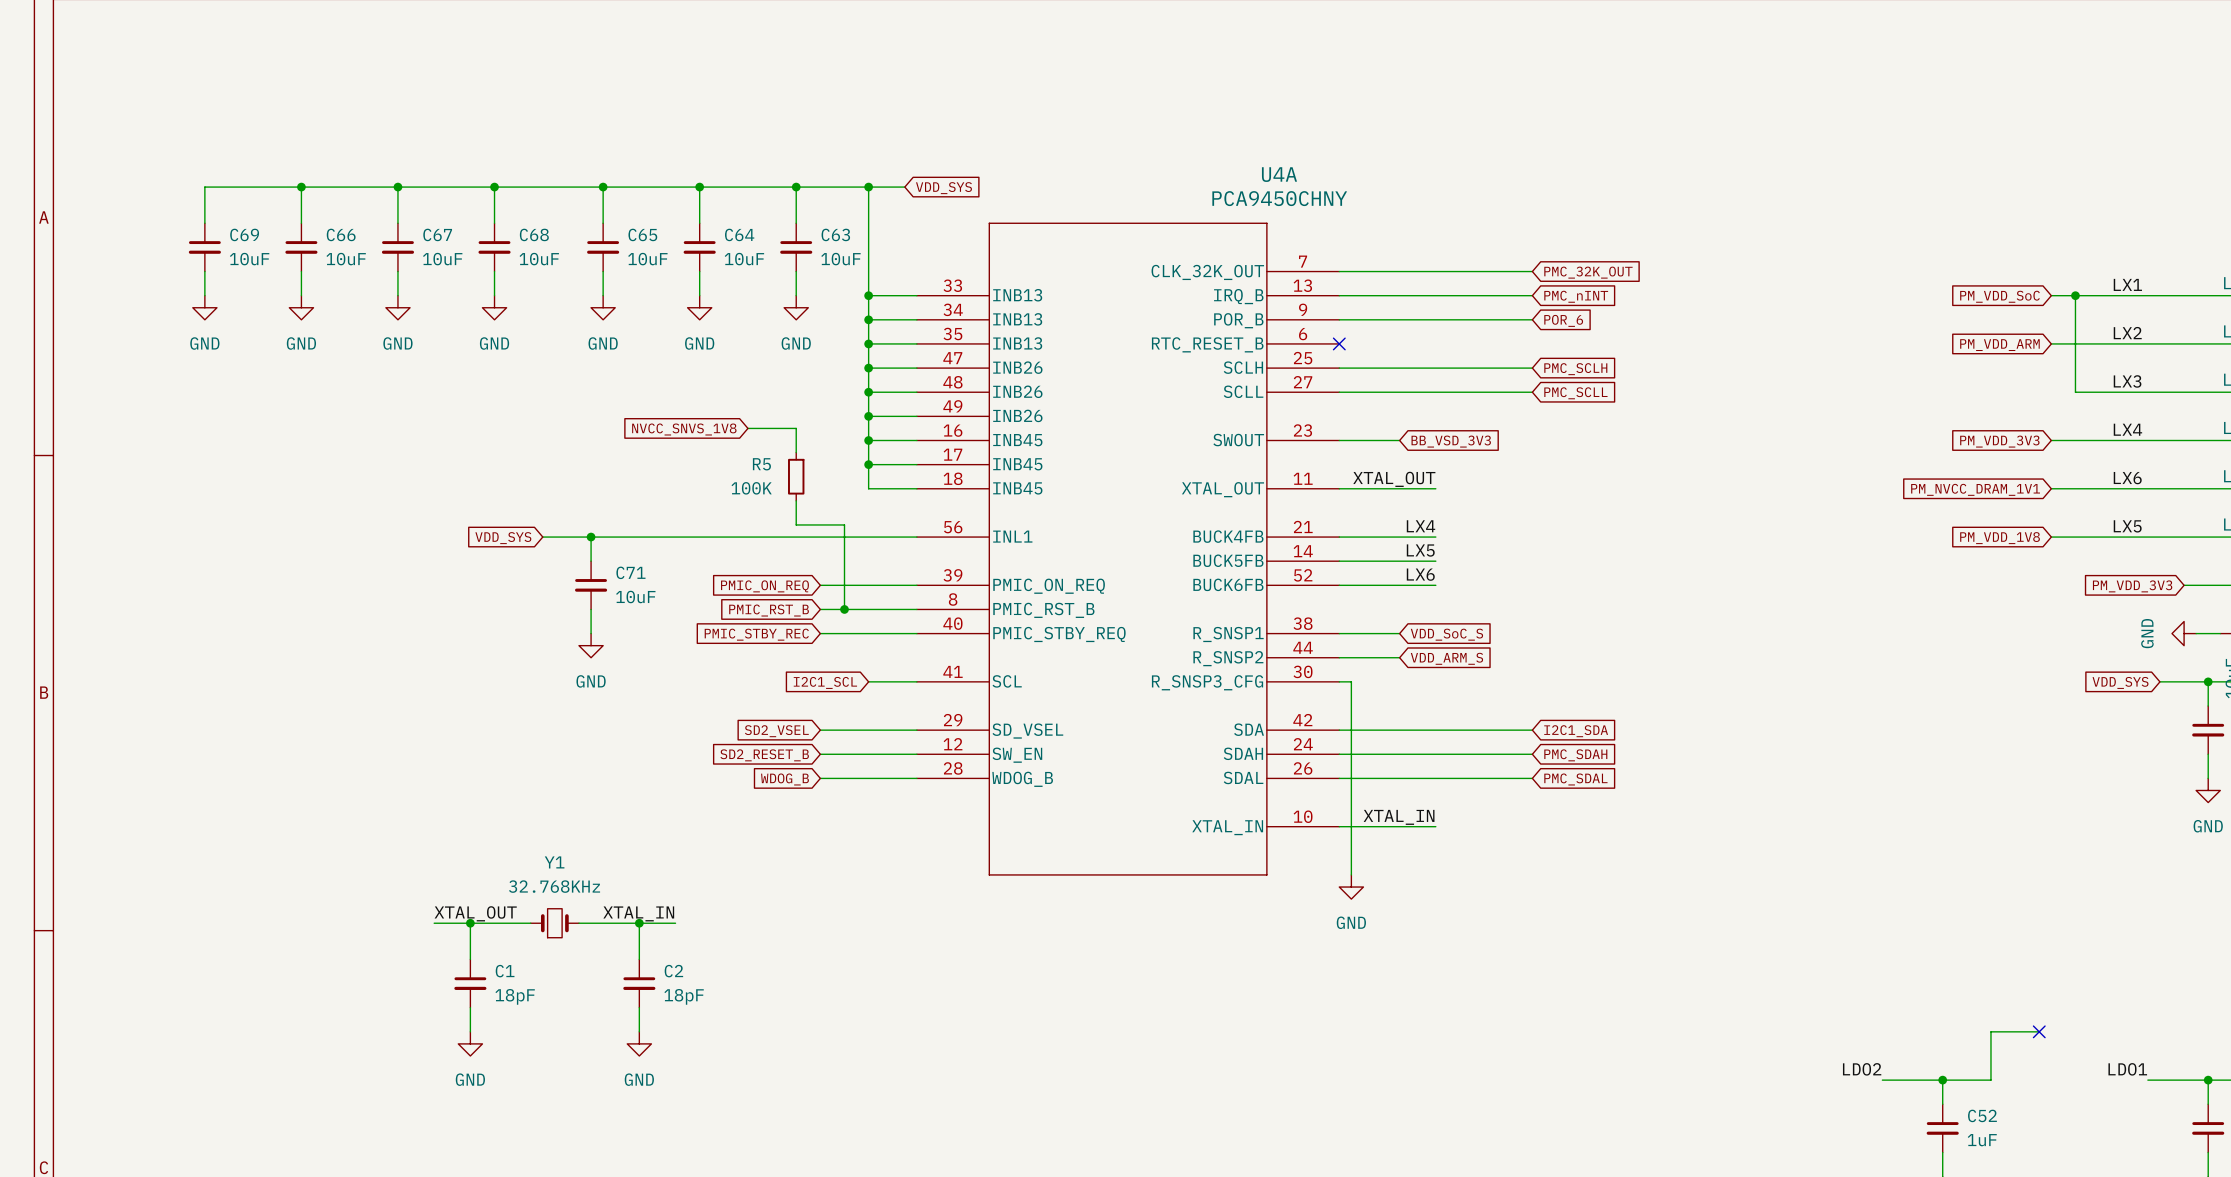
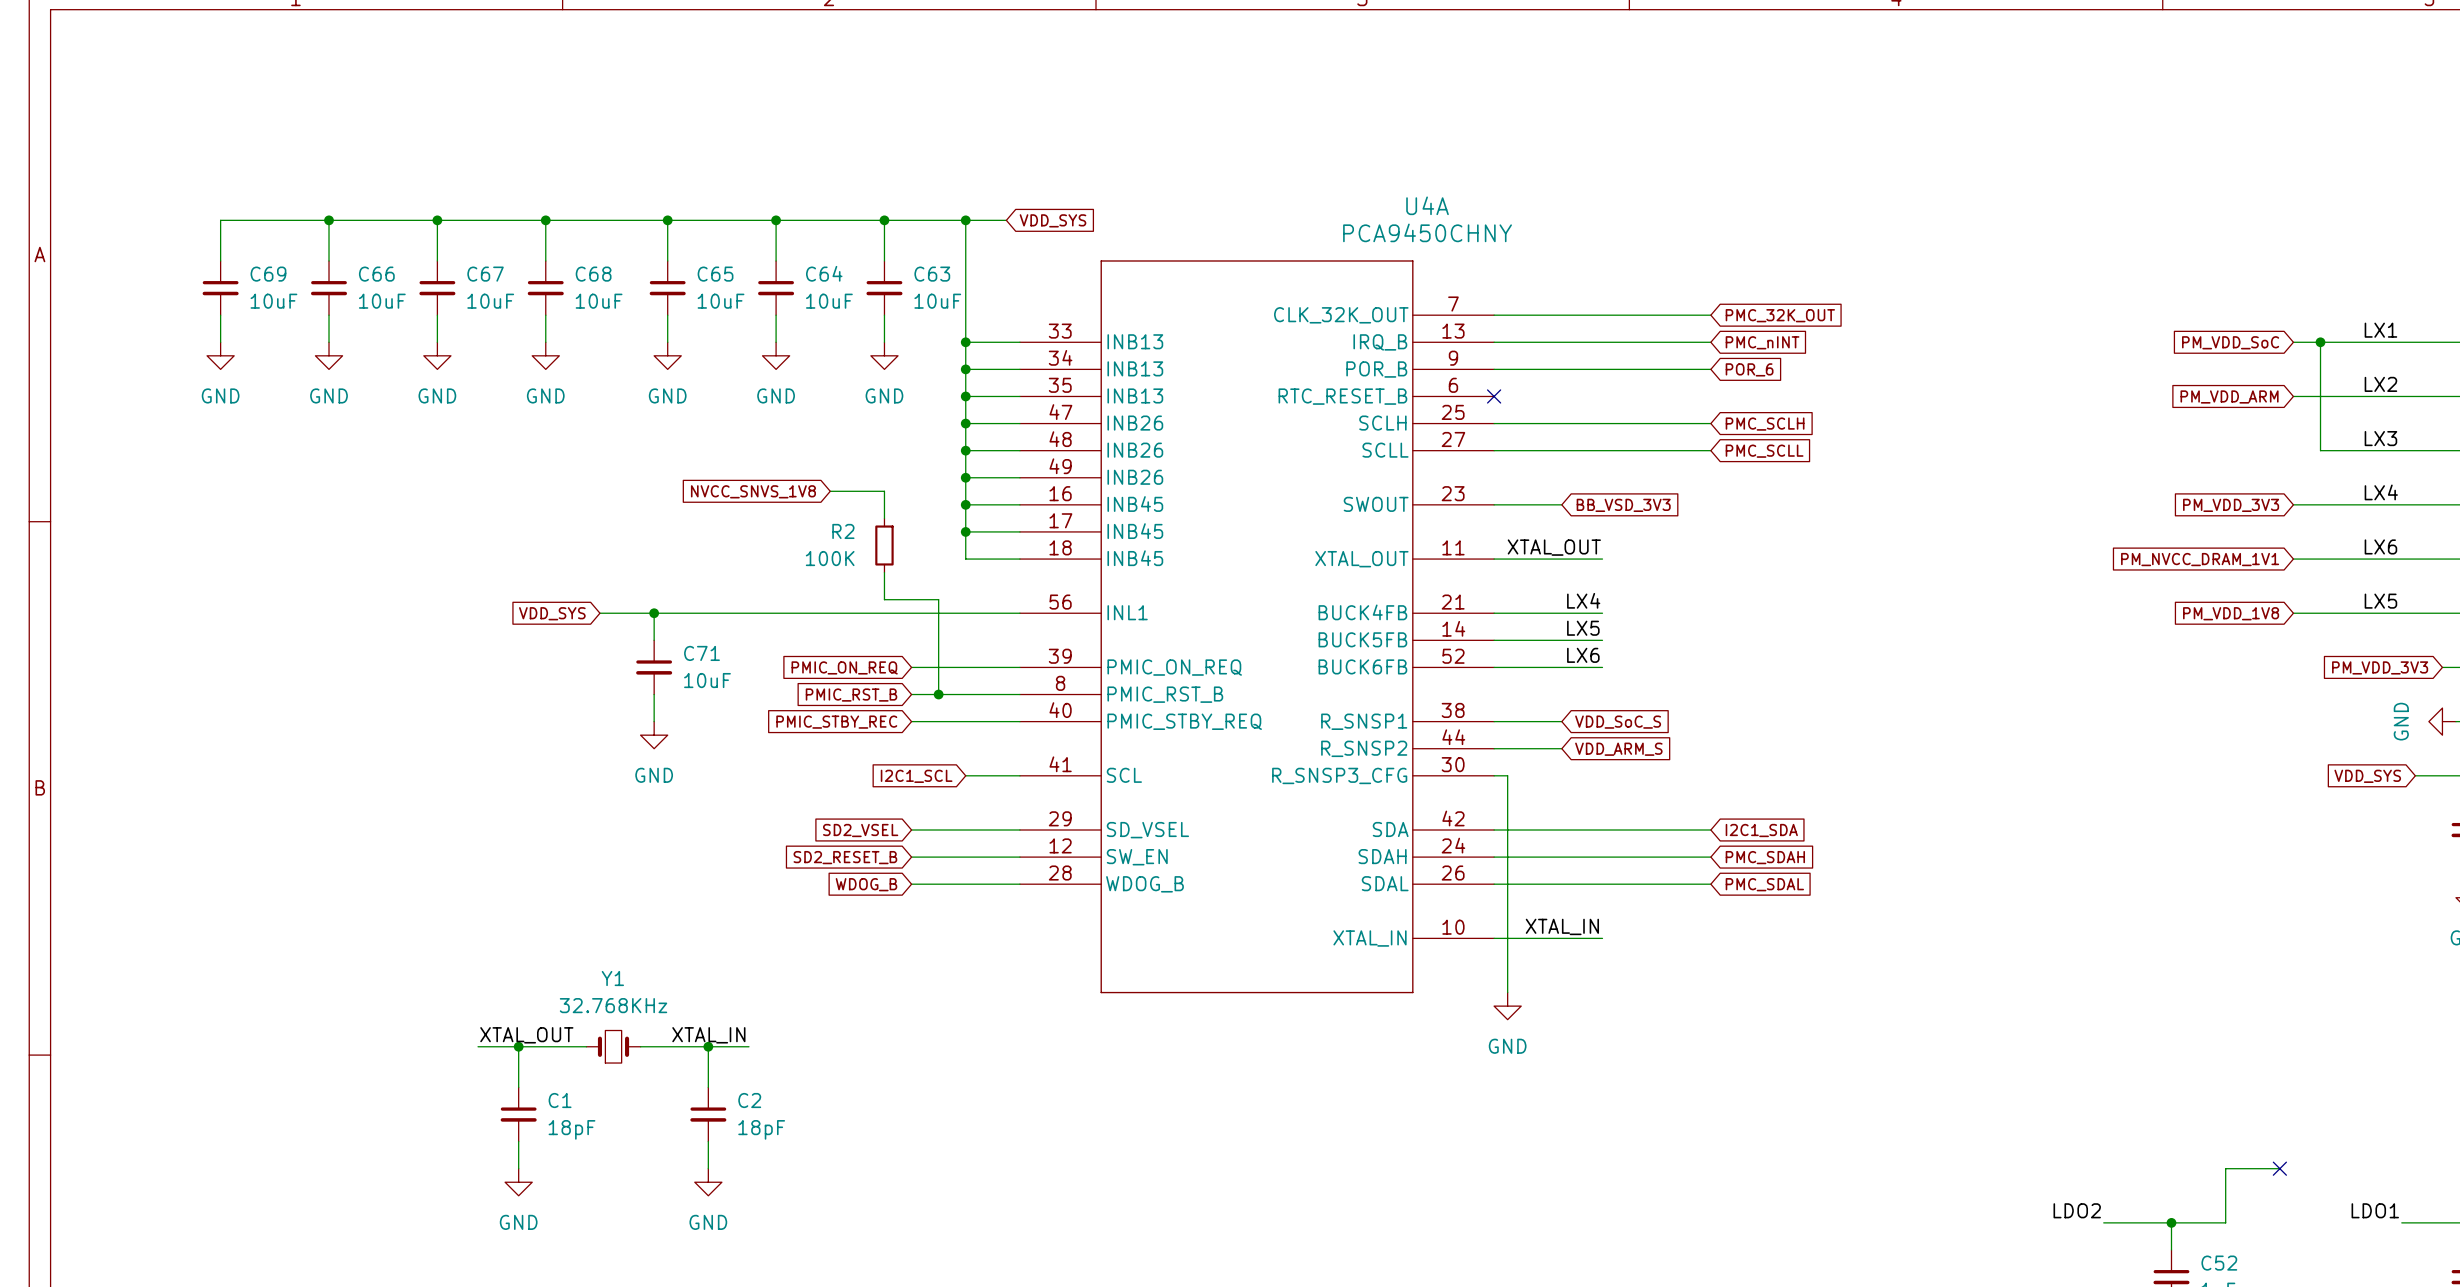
R5 name: R5 (761, 464) -> R2 (843, 531)

